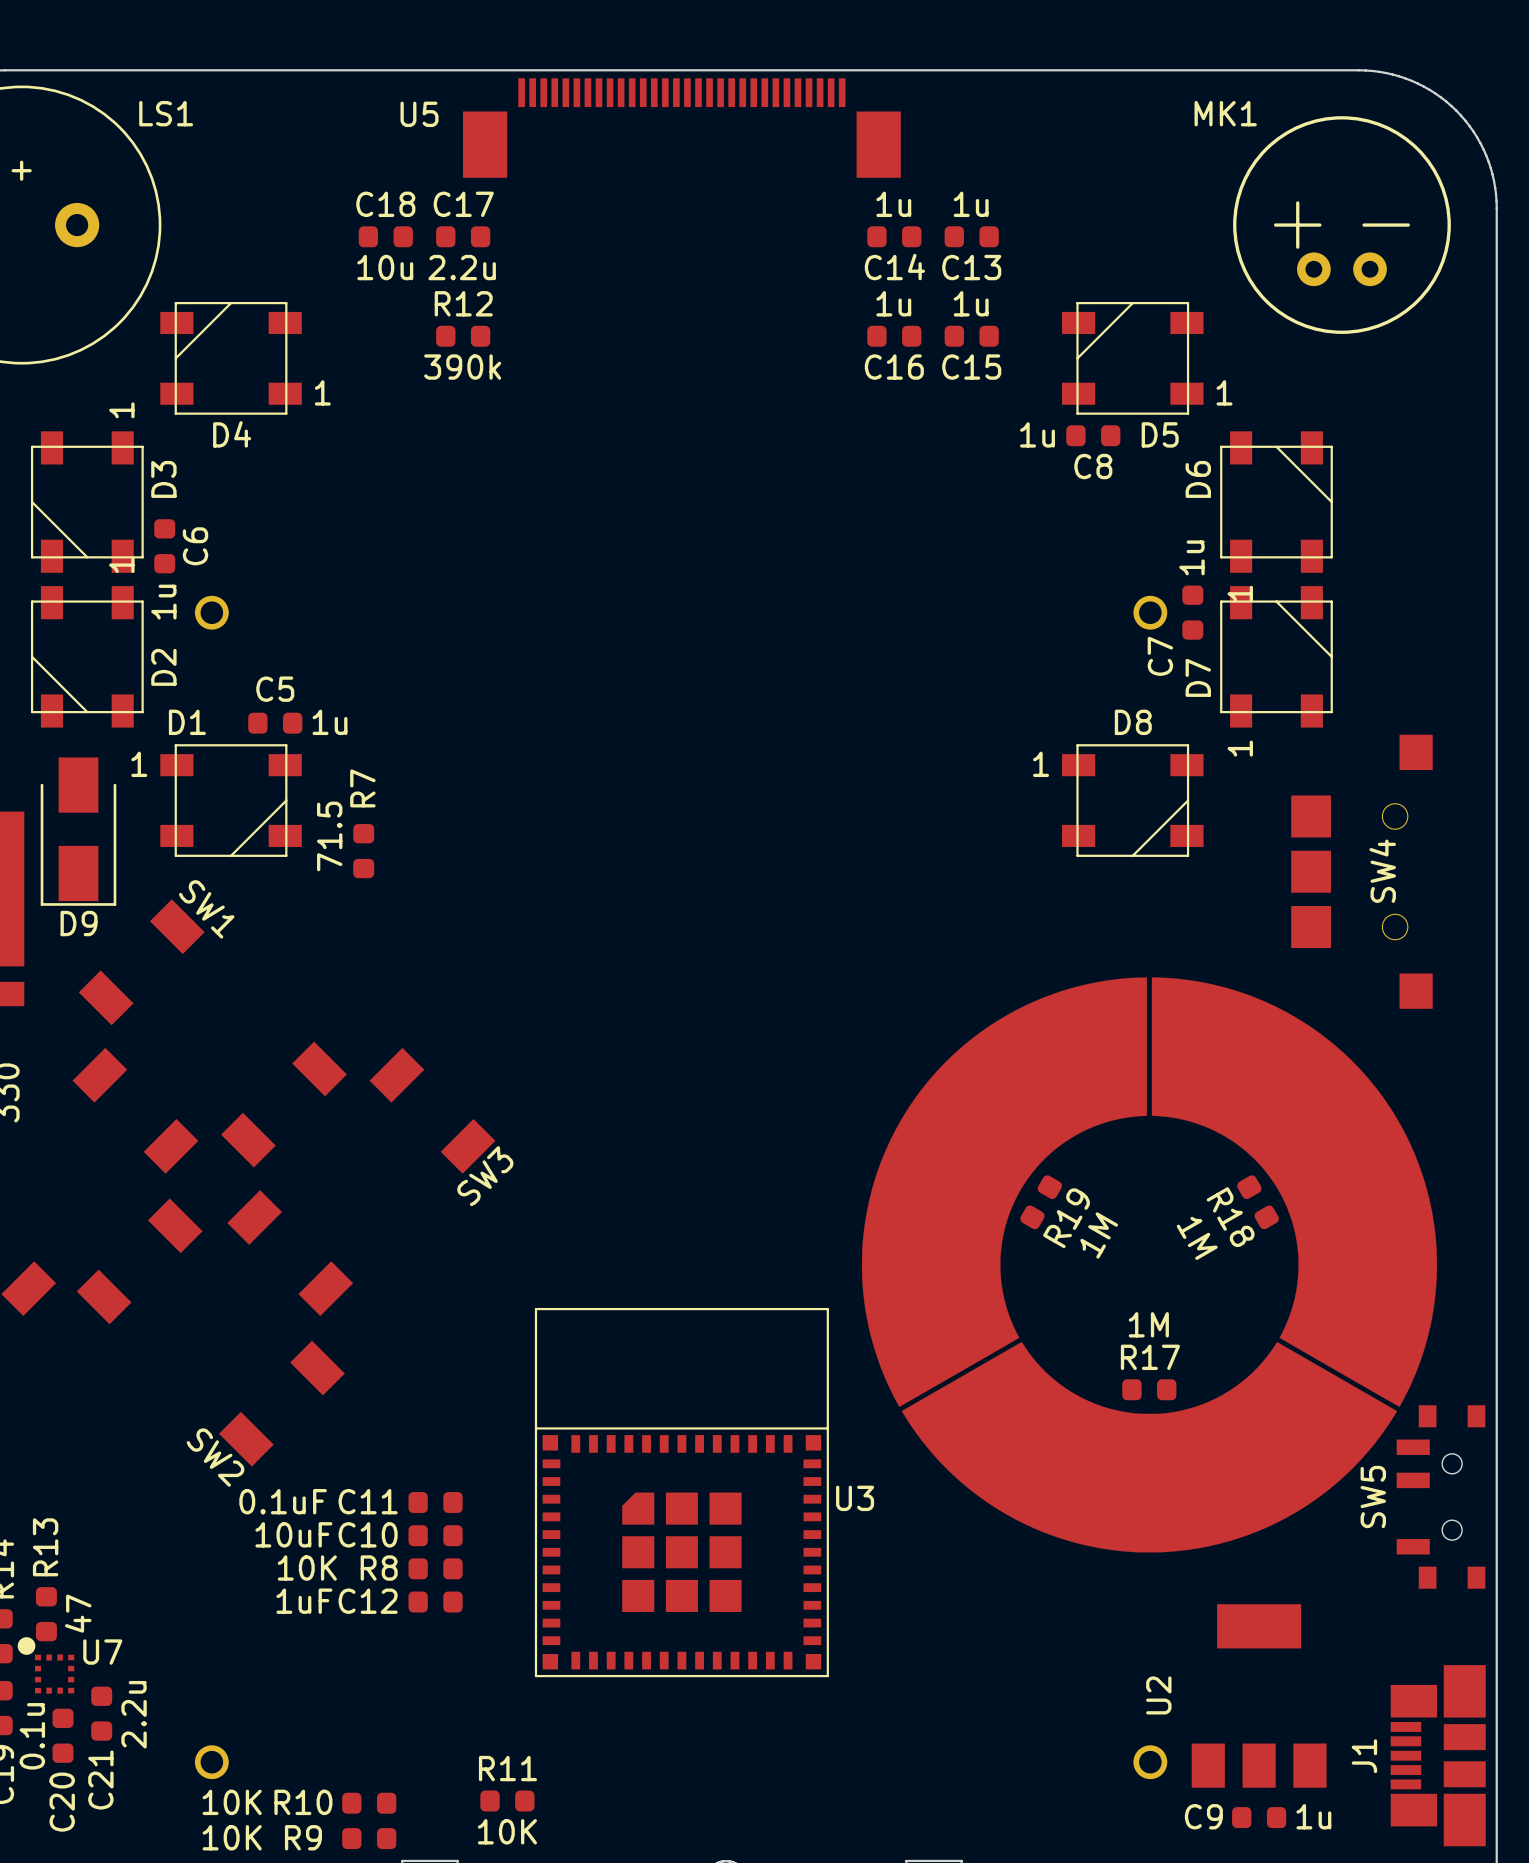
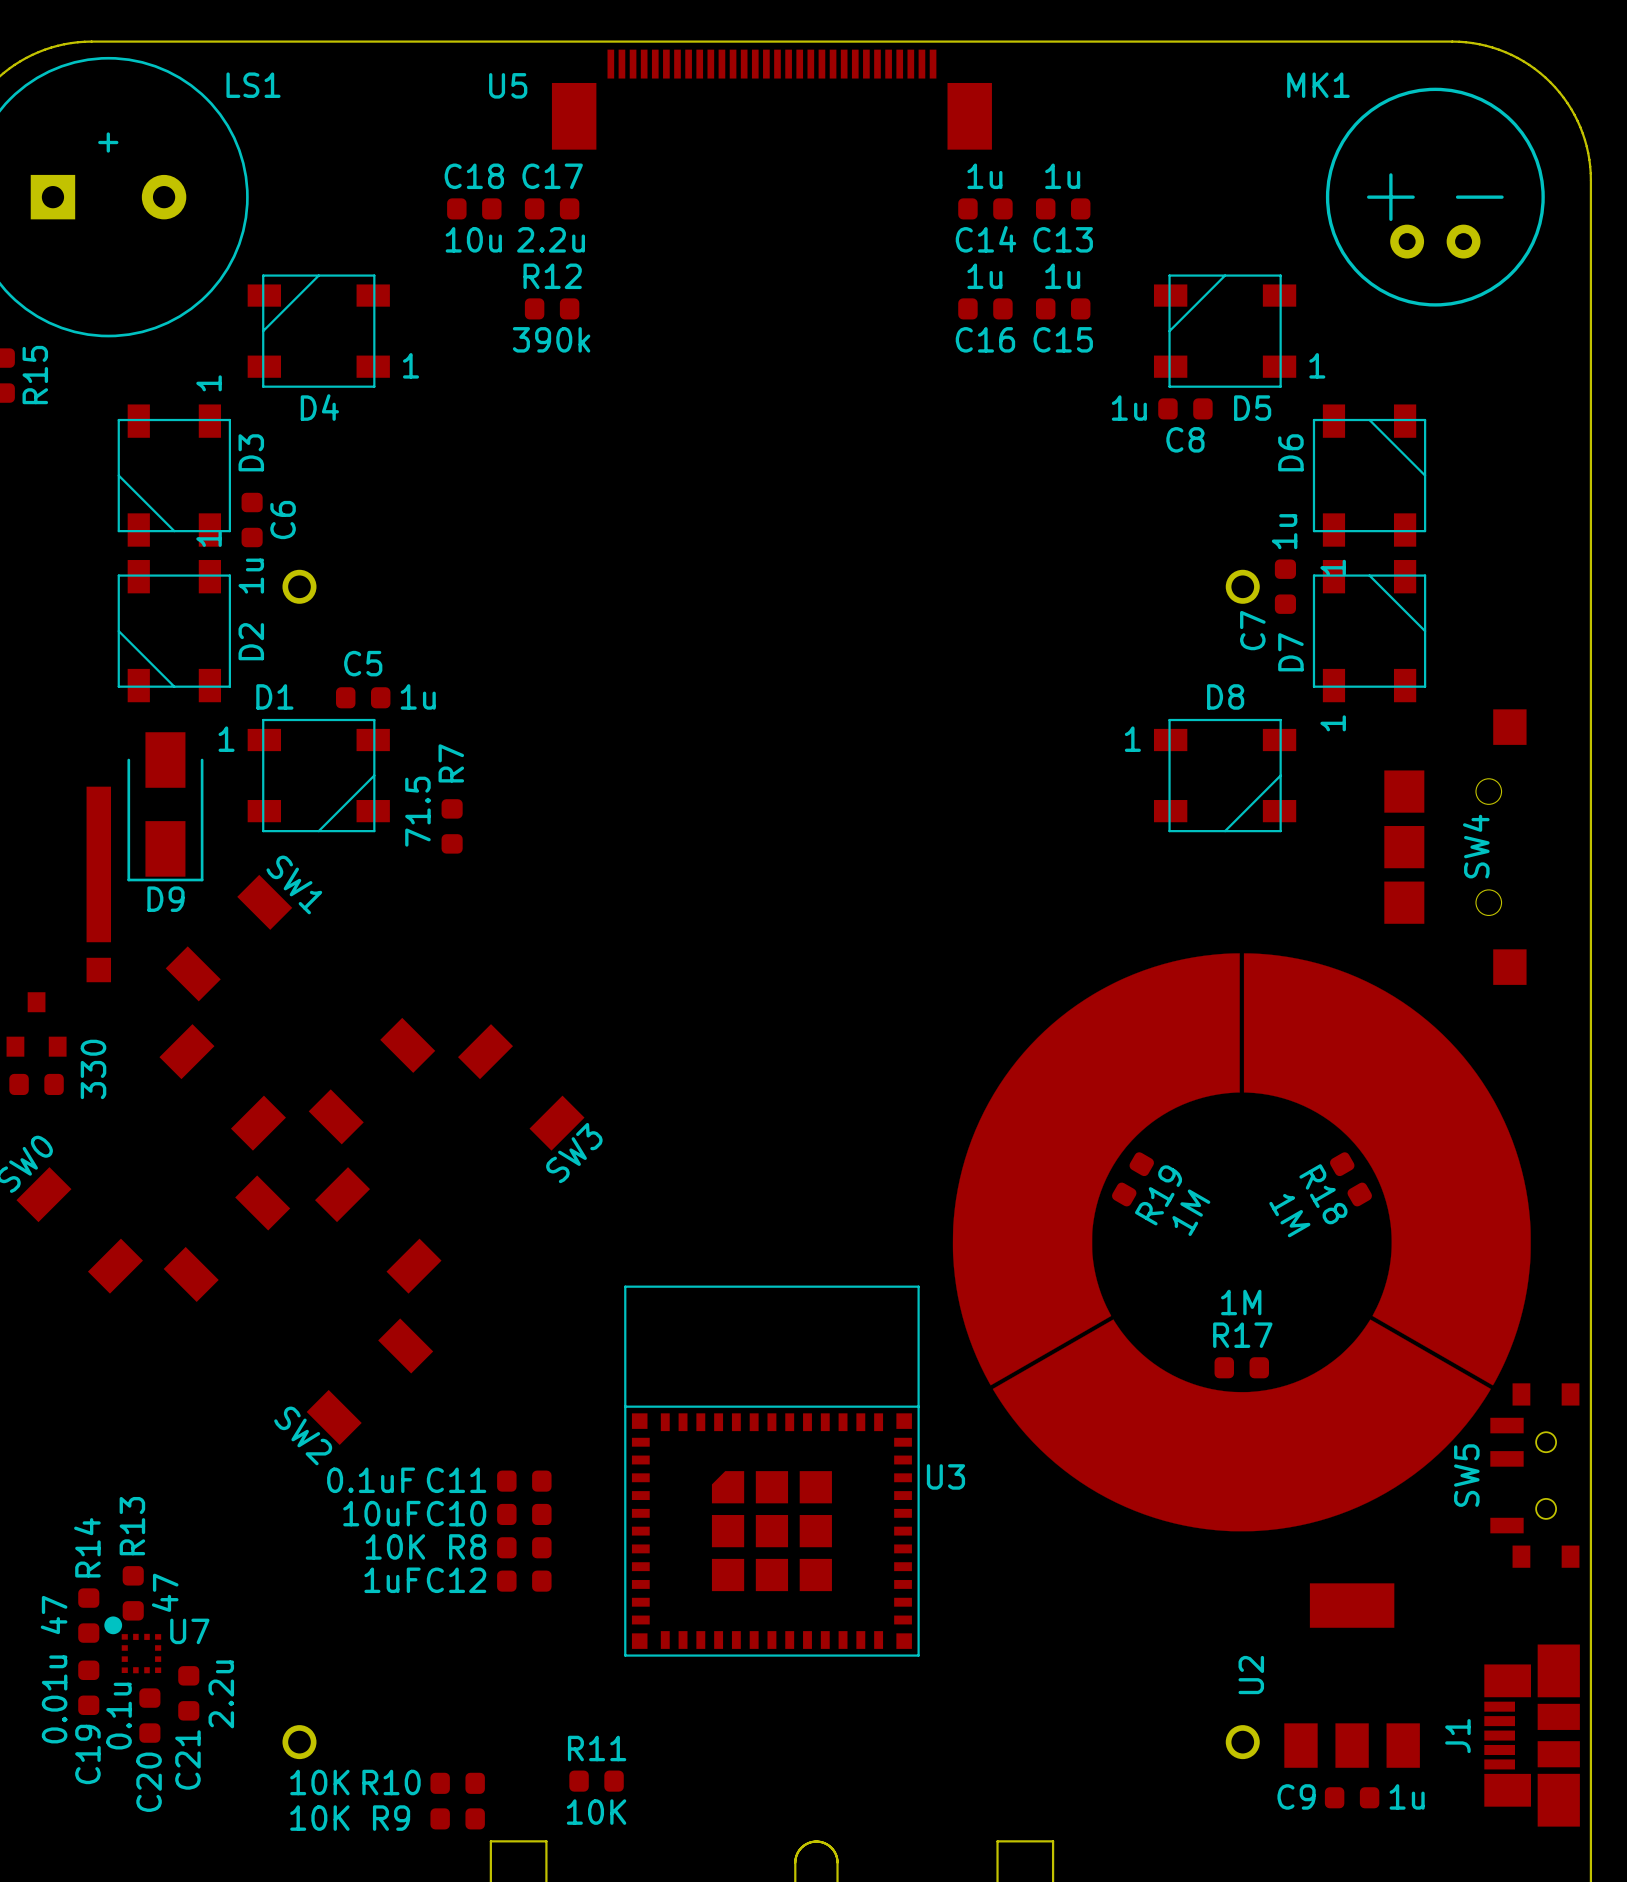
part footprint: [861, 977, 1437, 1553] -> [952, 953, 1531, 1532]

